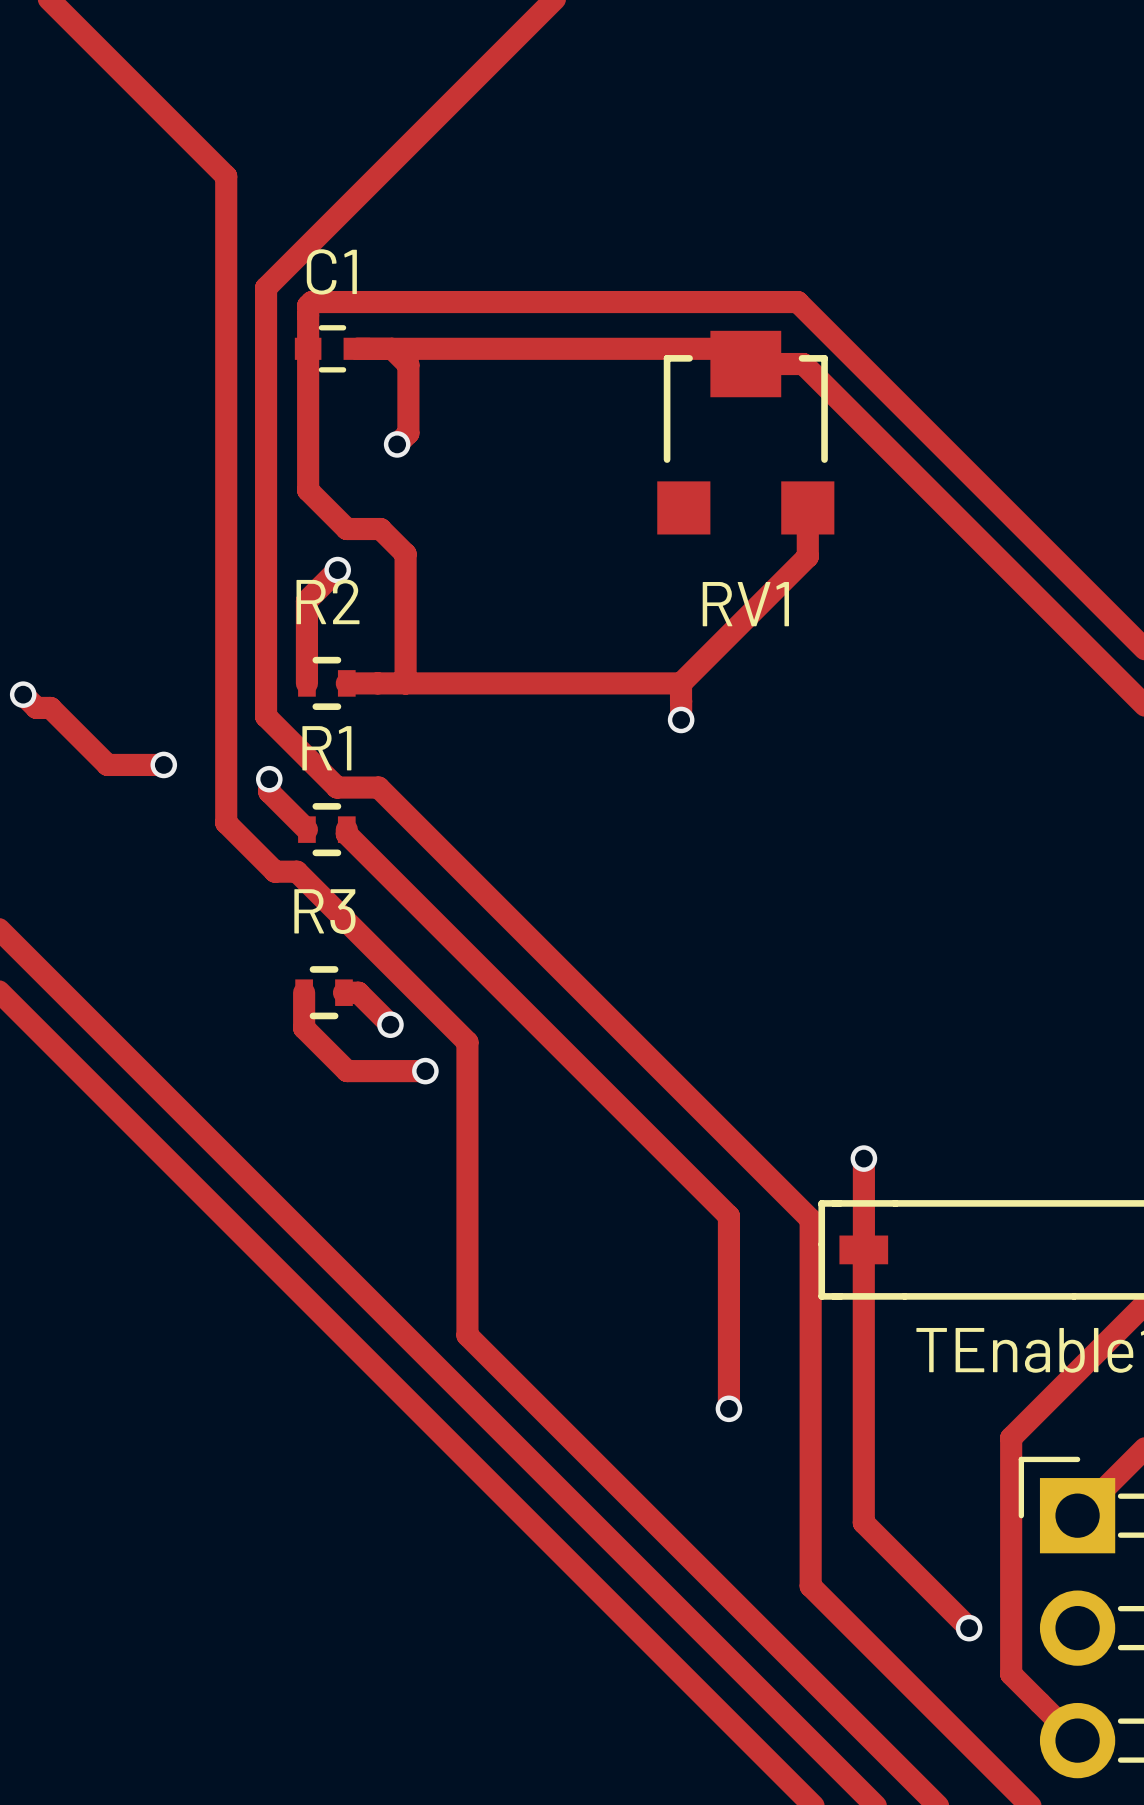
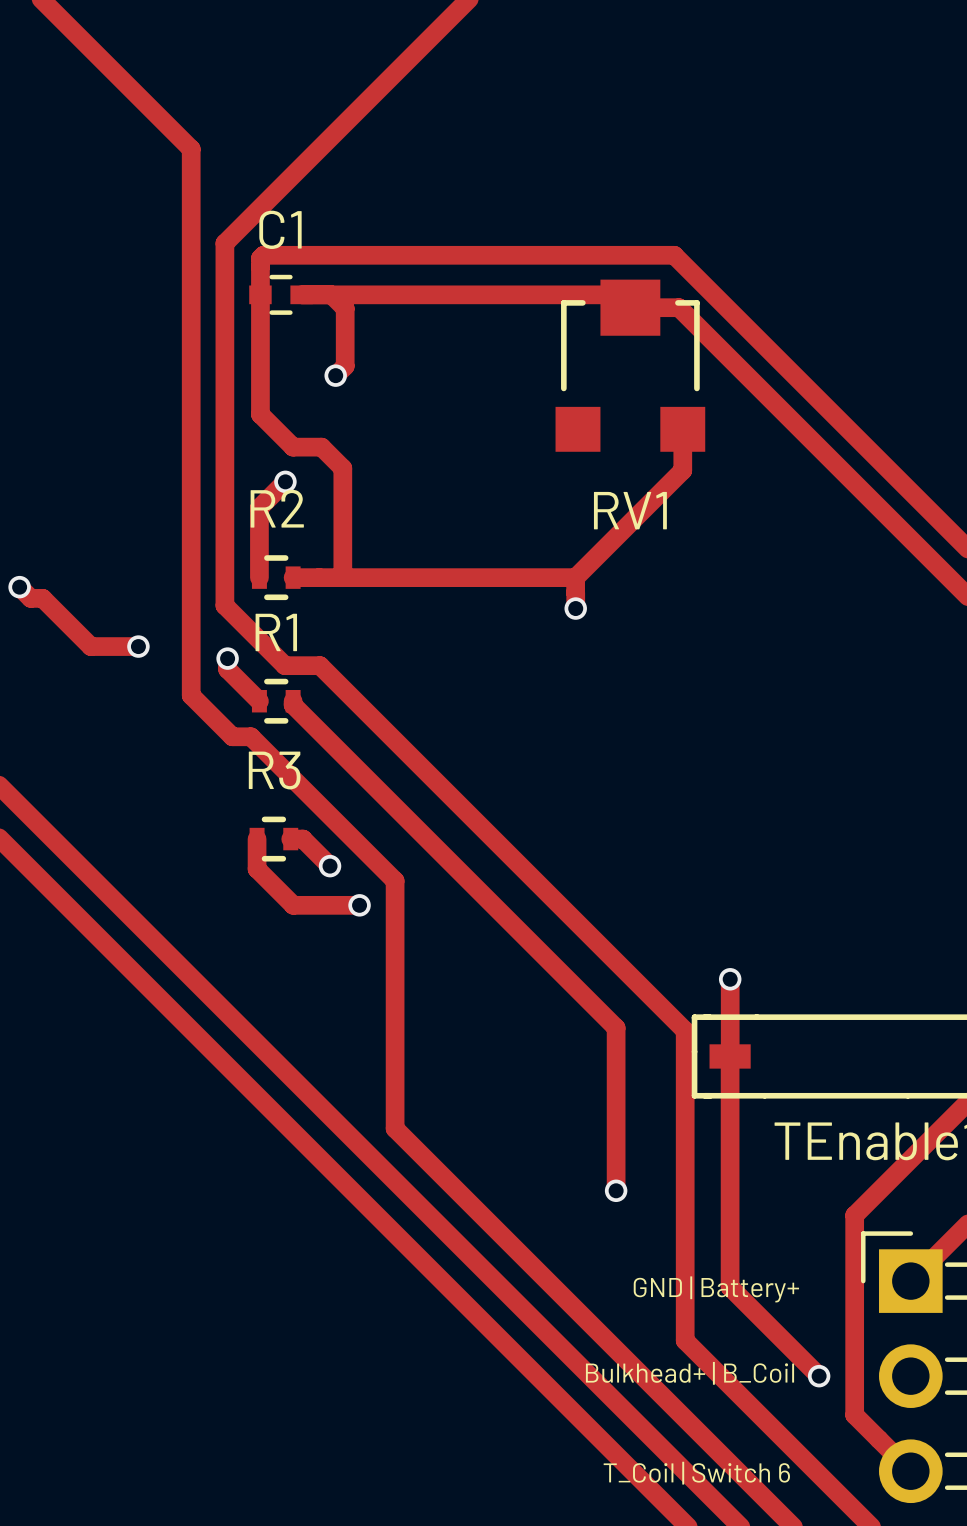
text: none -> GND | Battery+ (716, 1289)
text: none -> Bulkhead+ | B_Coil (690, 1373)
text: none -> T_Coil | Switch 6 (696, 1473)

